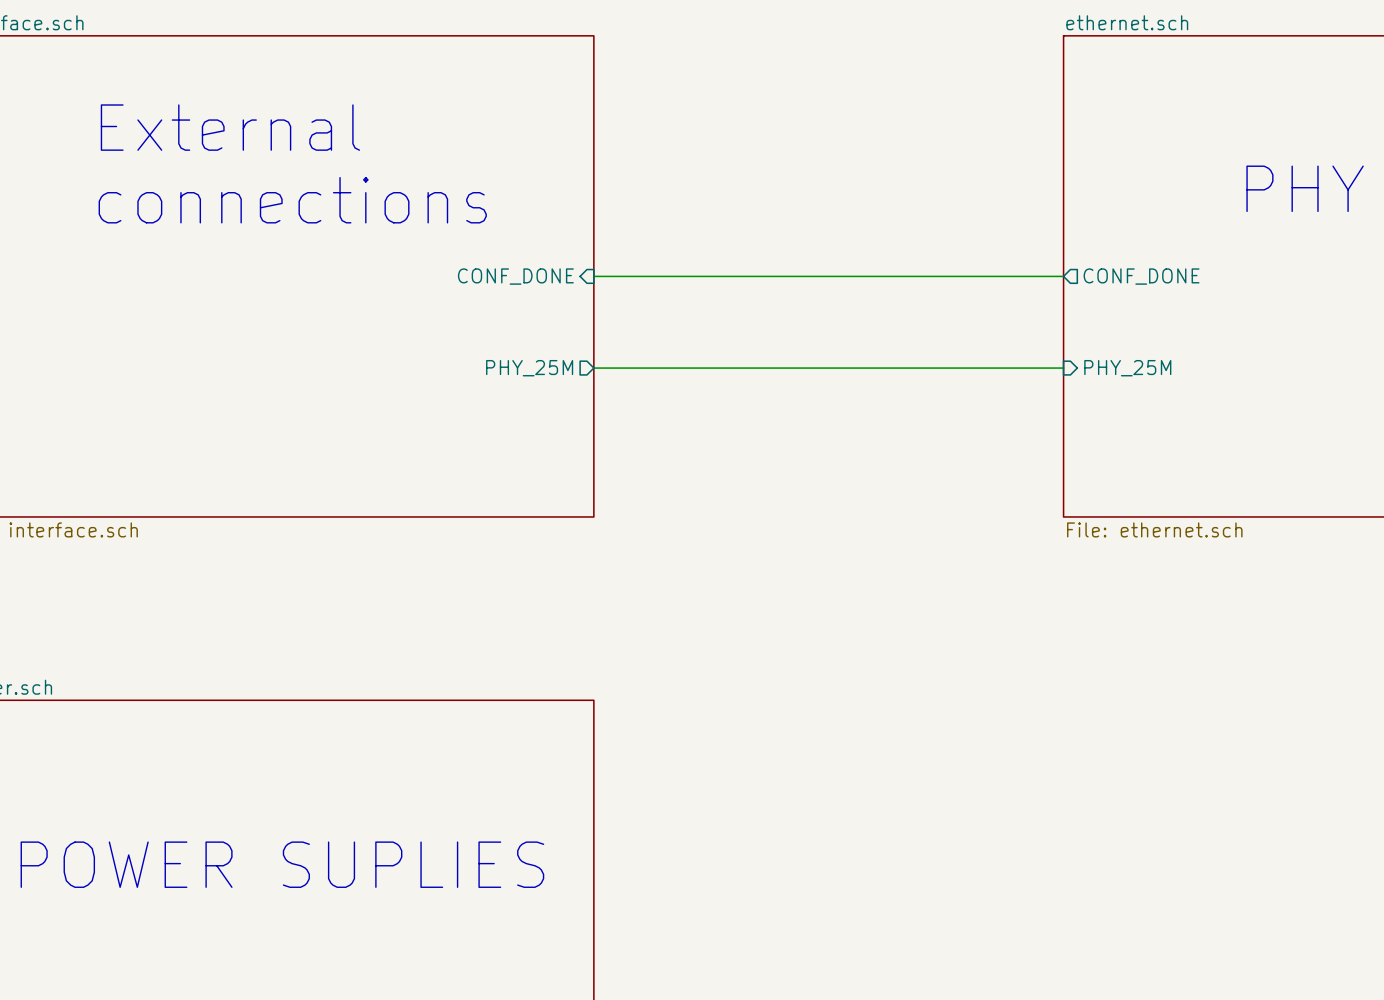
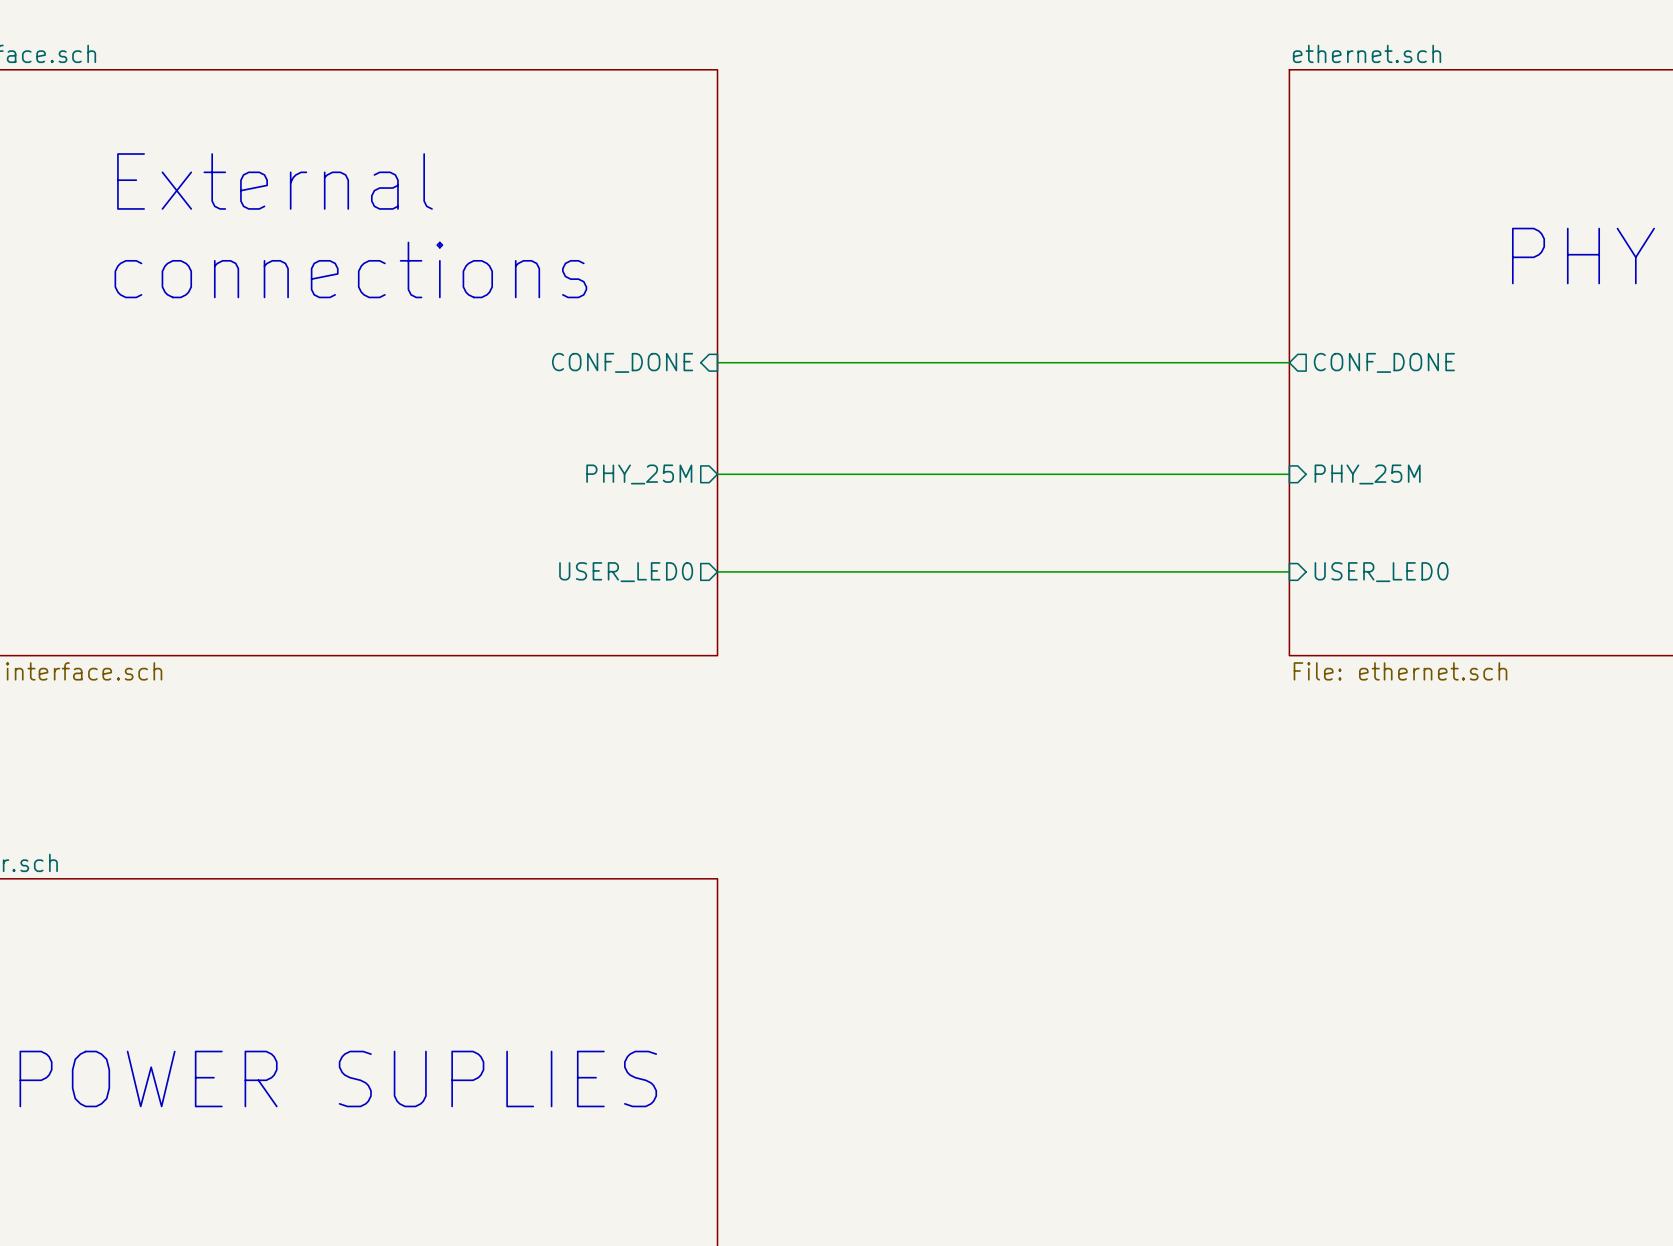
sheet pin: none -> USER_LED0 (626, 572)
wire: none -> (717, 571) (1289, 571)
sheet pin: none -> USER_LED0 (1381, 572)

